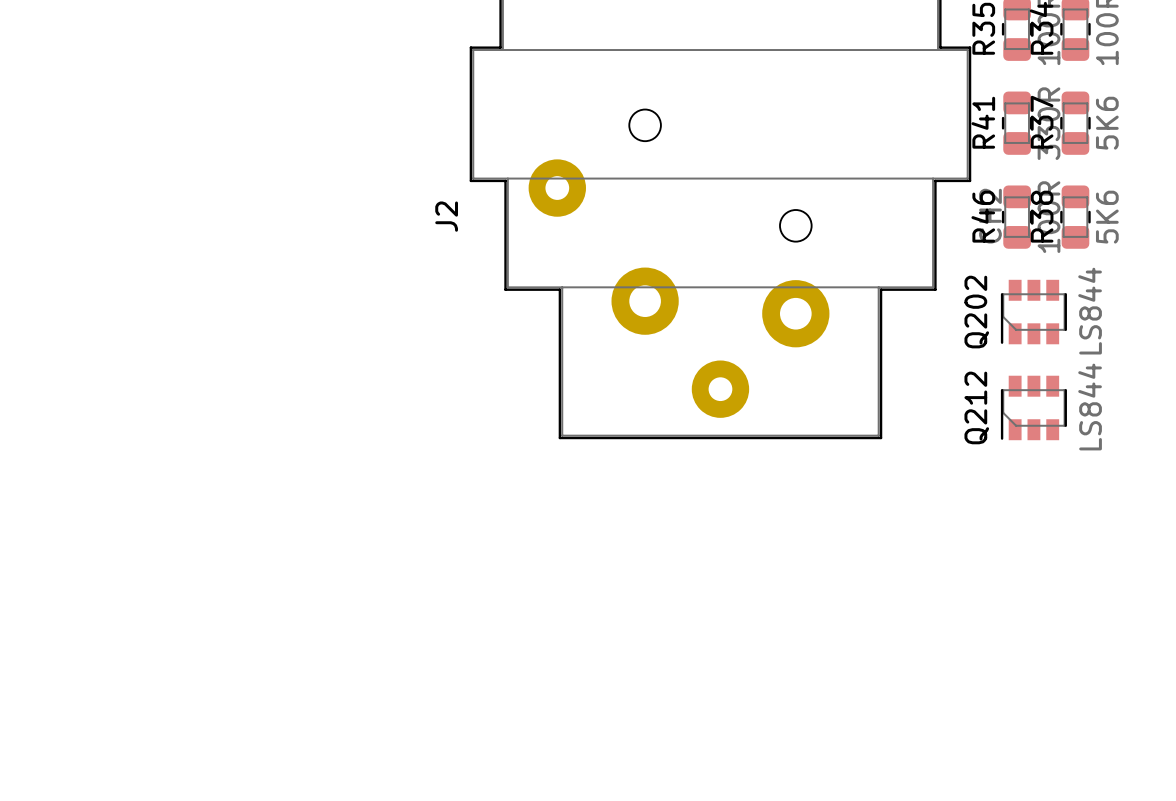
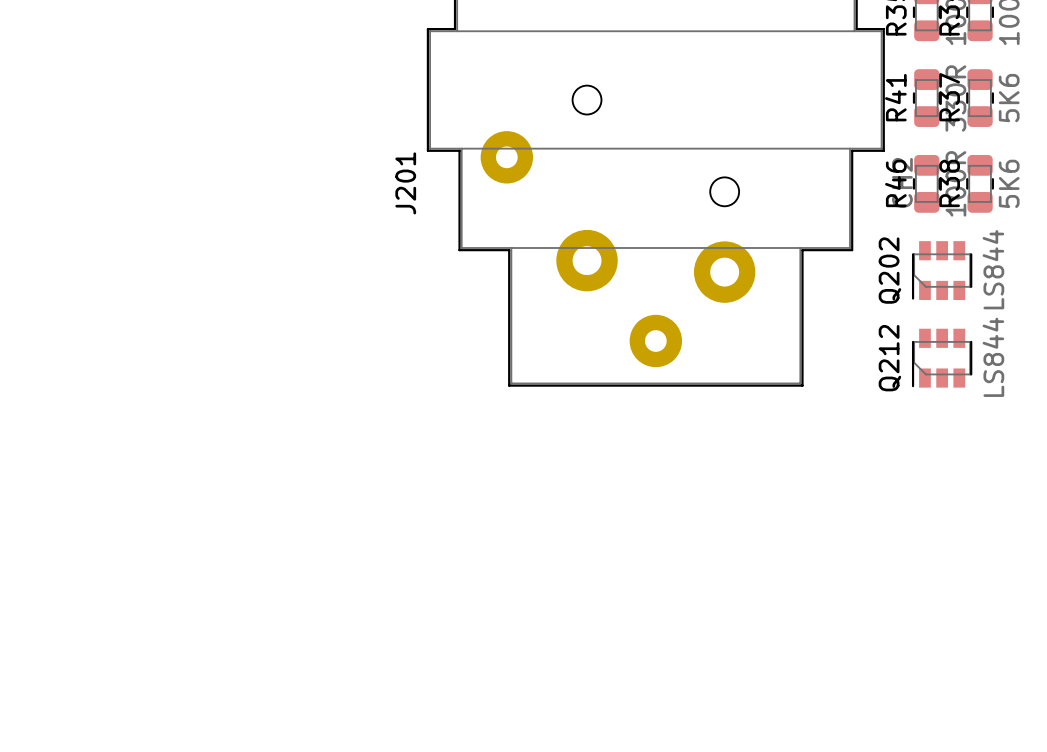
J2 name: J2 (446, 216) -> J201 (405, 183)

